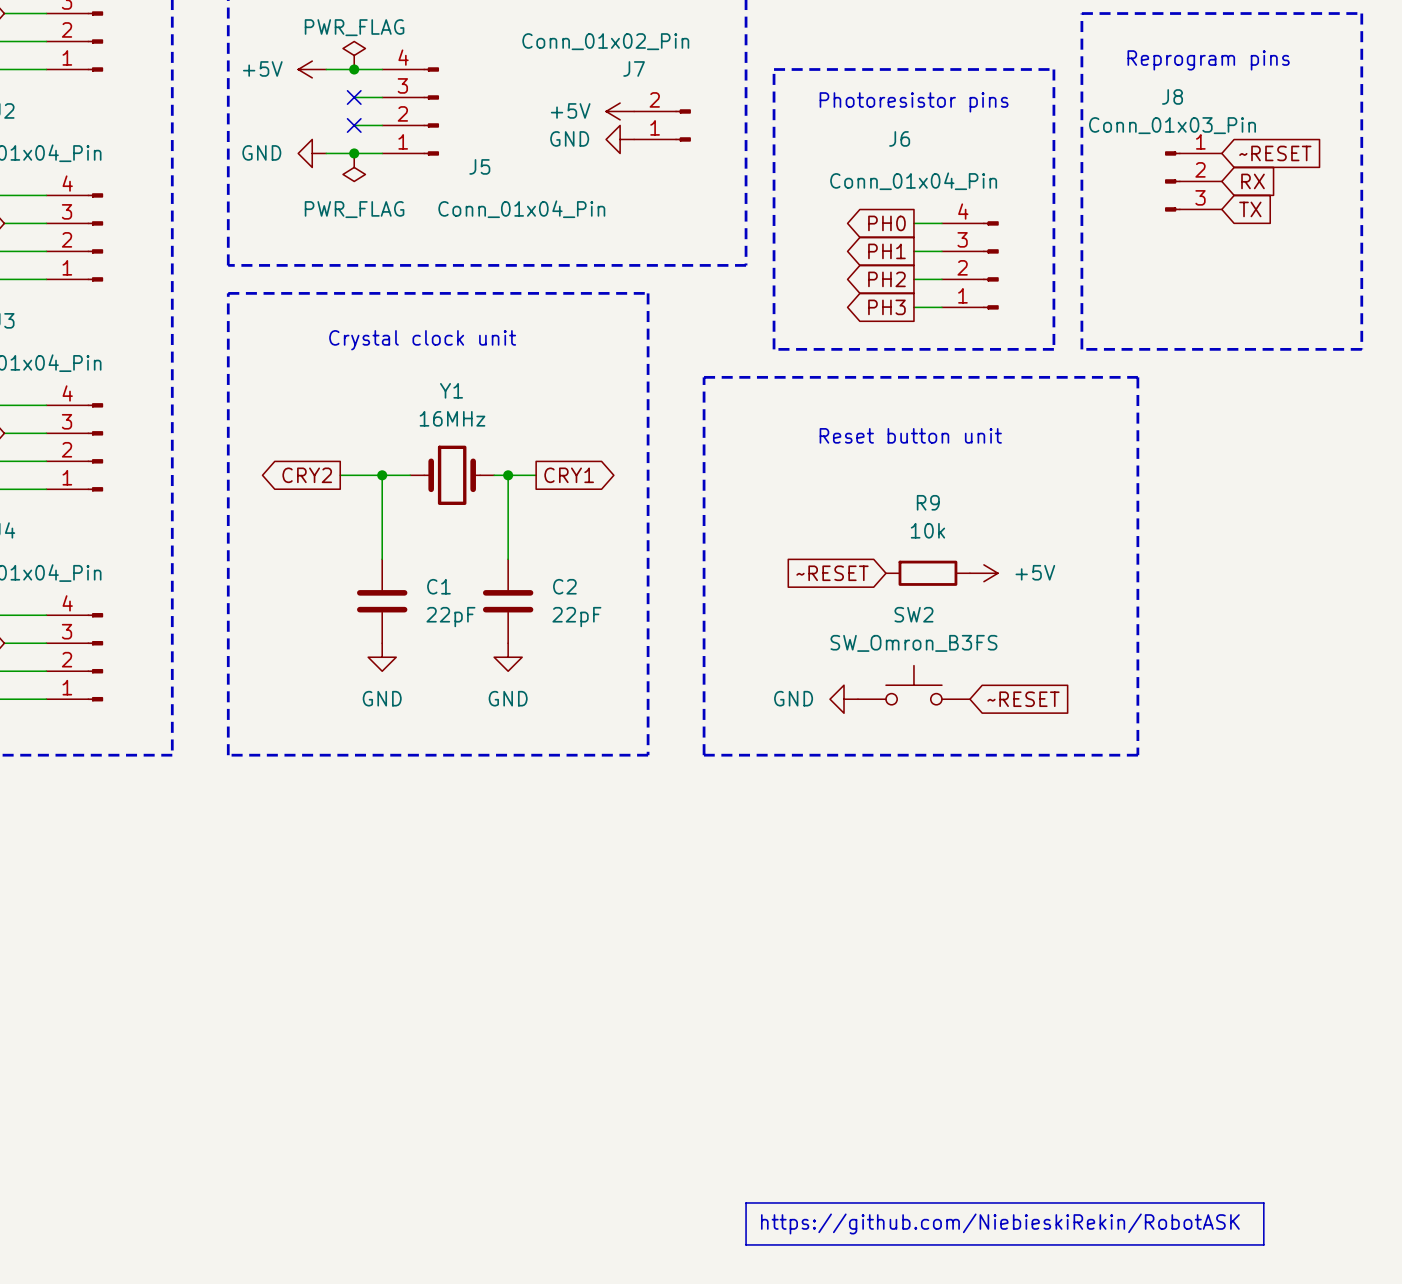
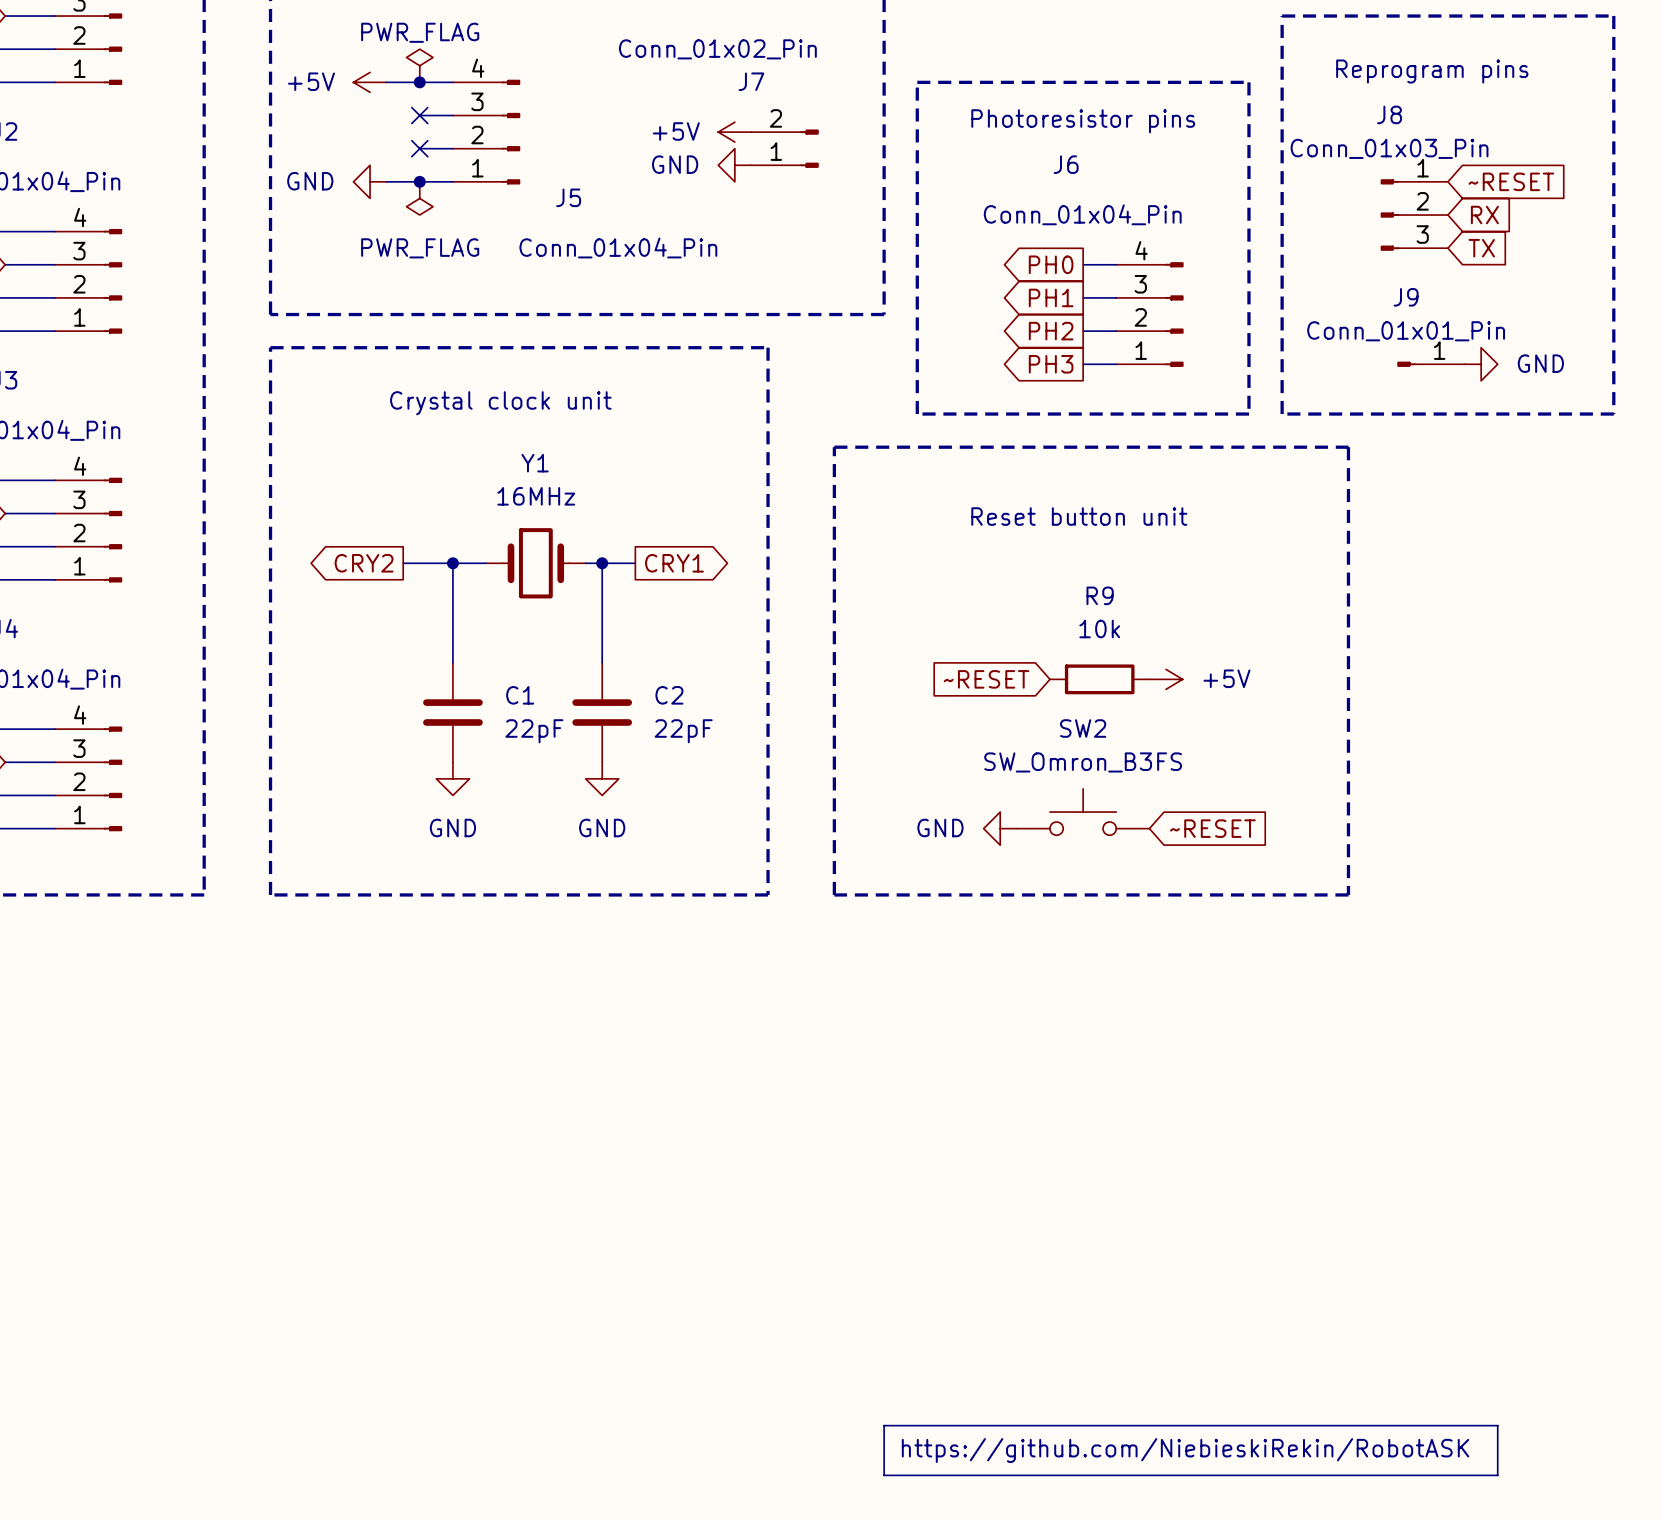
J9: none -> Conn_01x01_Pin (1430, 364)
power symbol: none -> GND (1481, 364)

